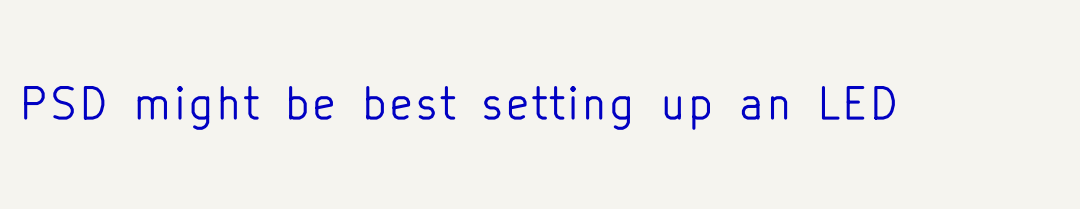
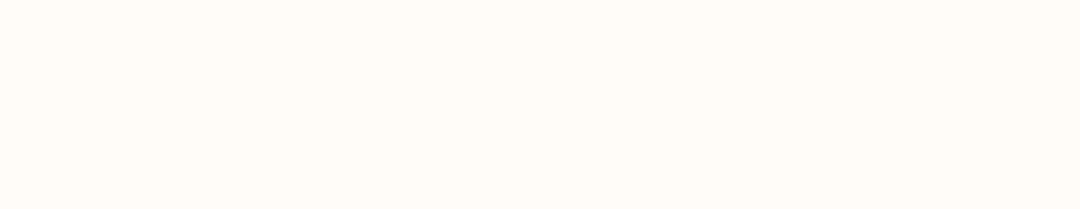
text: PSD might be best setting up an LED (459, 107) -> none

